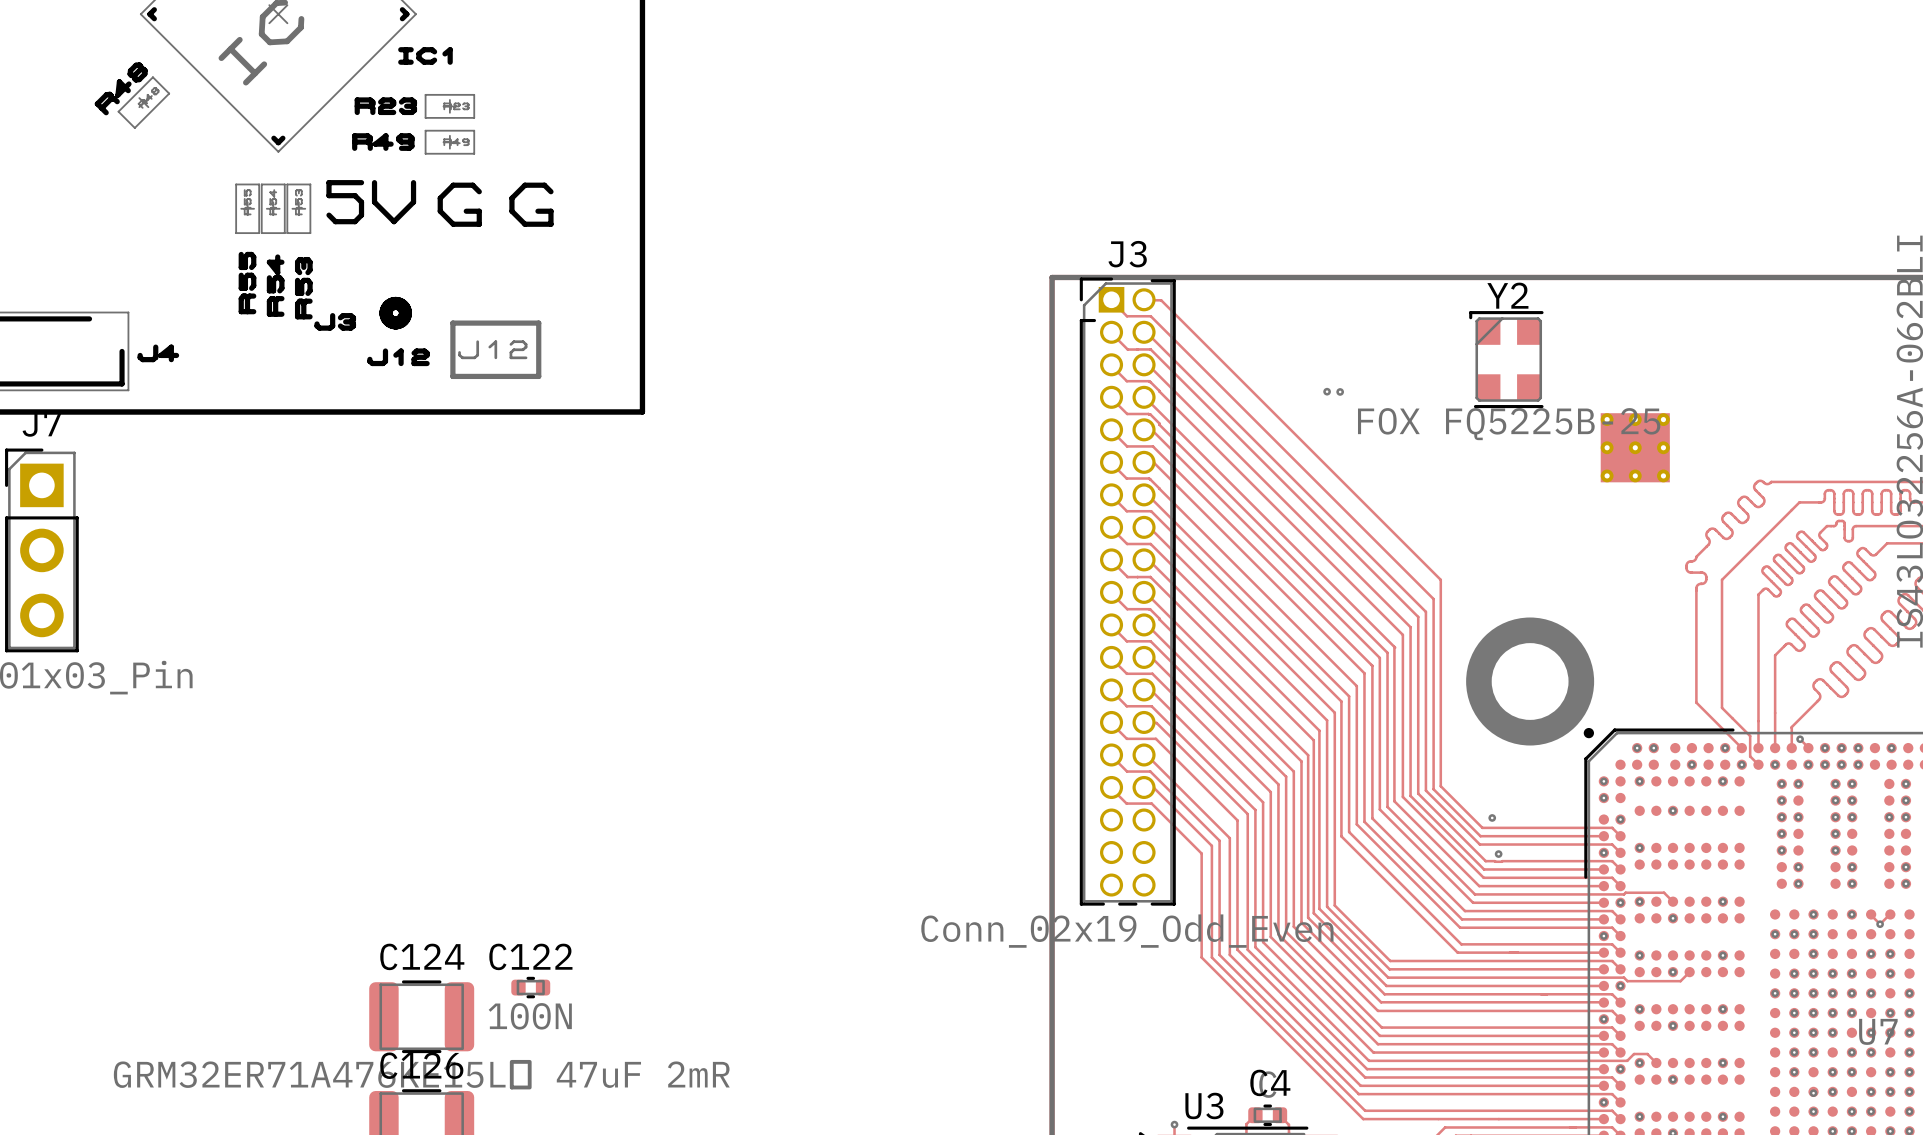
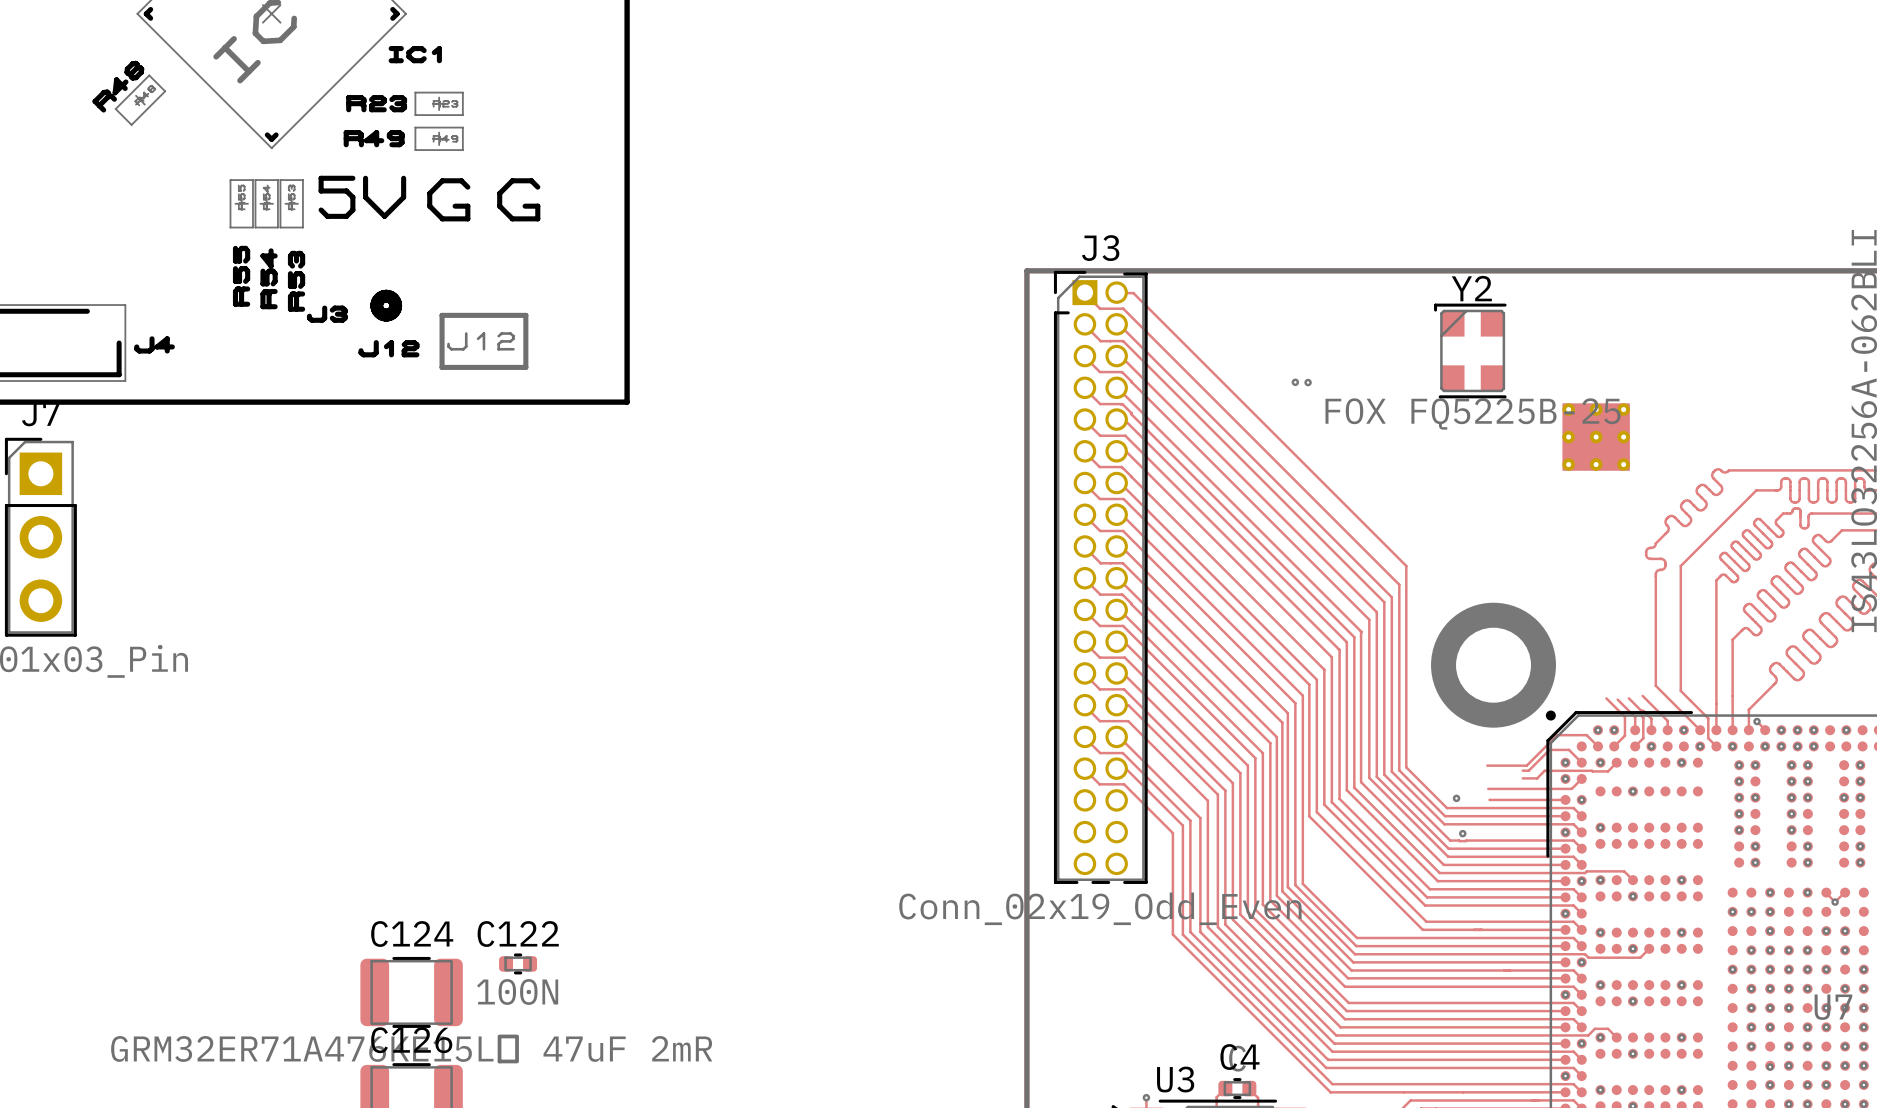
track: none -> (1642, 695) (1667, 720) (1667, 730)
track: none -> (1606, 698) (1624, 716) (1624, 735) (1614, 746)
track: none -> (1628, 698) (1651, 718) (1651, 730)
track: none -> (1617, 699) (1635, 717) (1635, 730)
track: none -> (1641, 715) (1643, 717) (1643, 738) (1635, 746)
track: none -> (1597, 746) (1586, 735) (1557, 735) (1526, 765) (1487, 765)
track: none -> (1581, 762) (1568, 749) (1549, 749) (1528, 770) (1522, 770)
track: none -> (1616, 762) (1607, 771) (1544, 770) (1537, 778) (1522, 778)
track: none -> (1581, 778) (1571, 788) (1488, 788)
track: none -> (1489, 799) (1565, 799)

